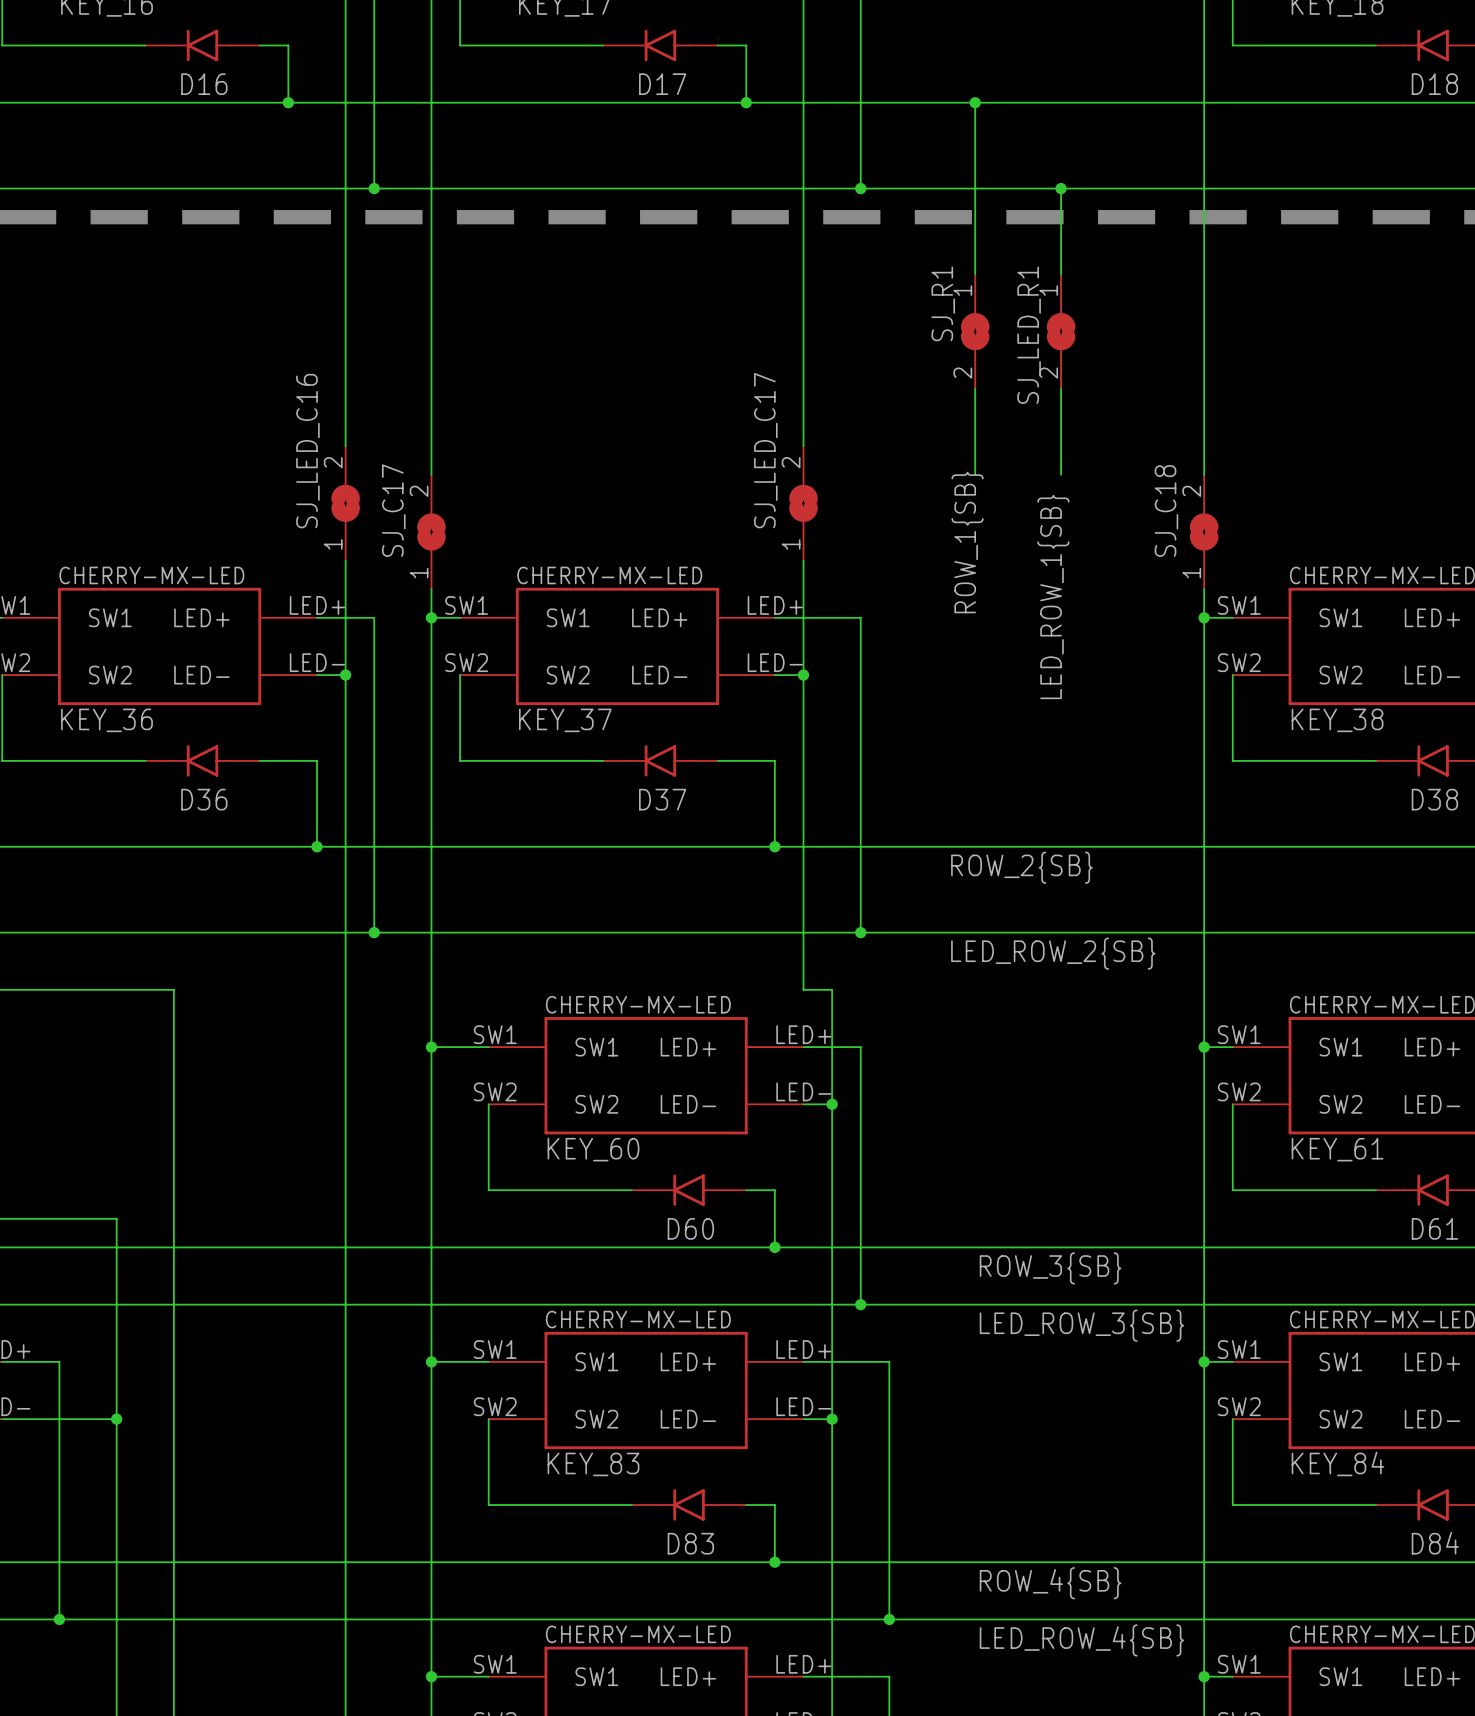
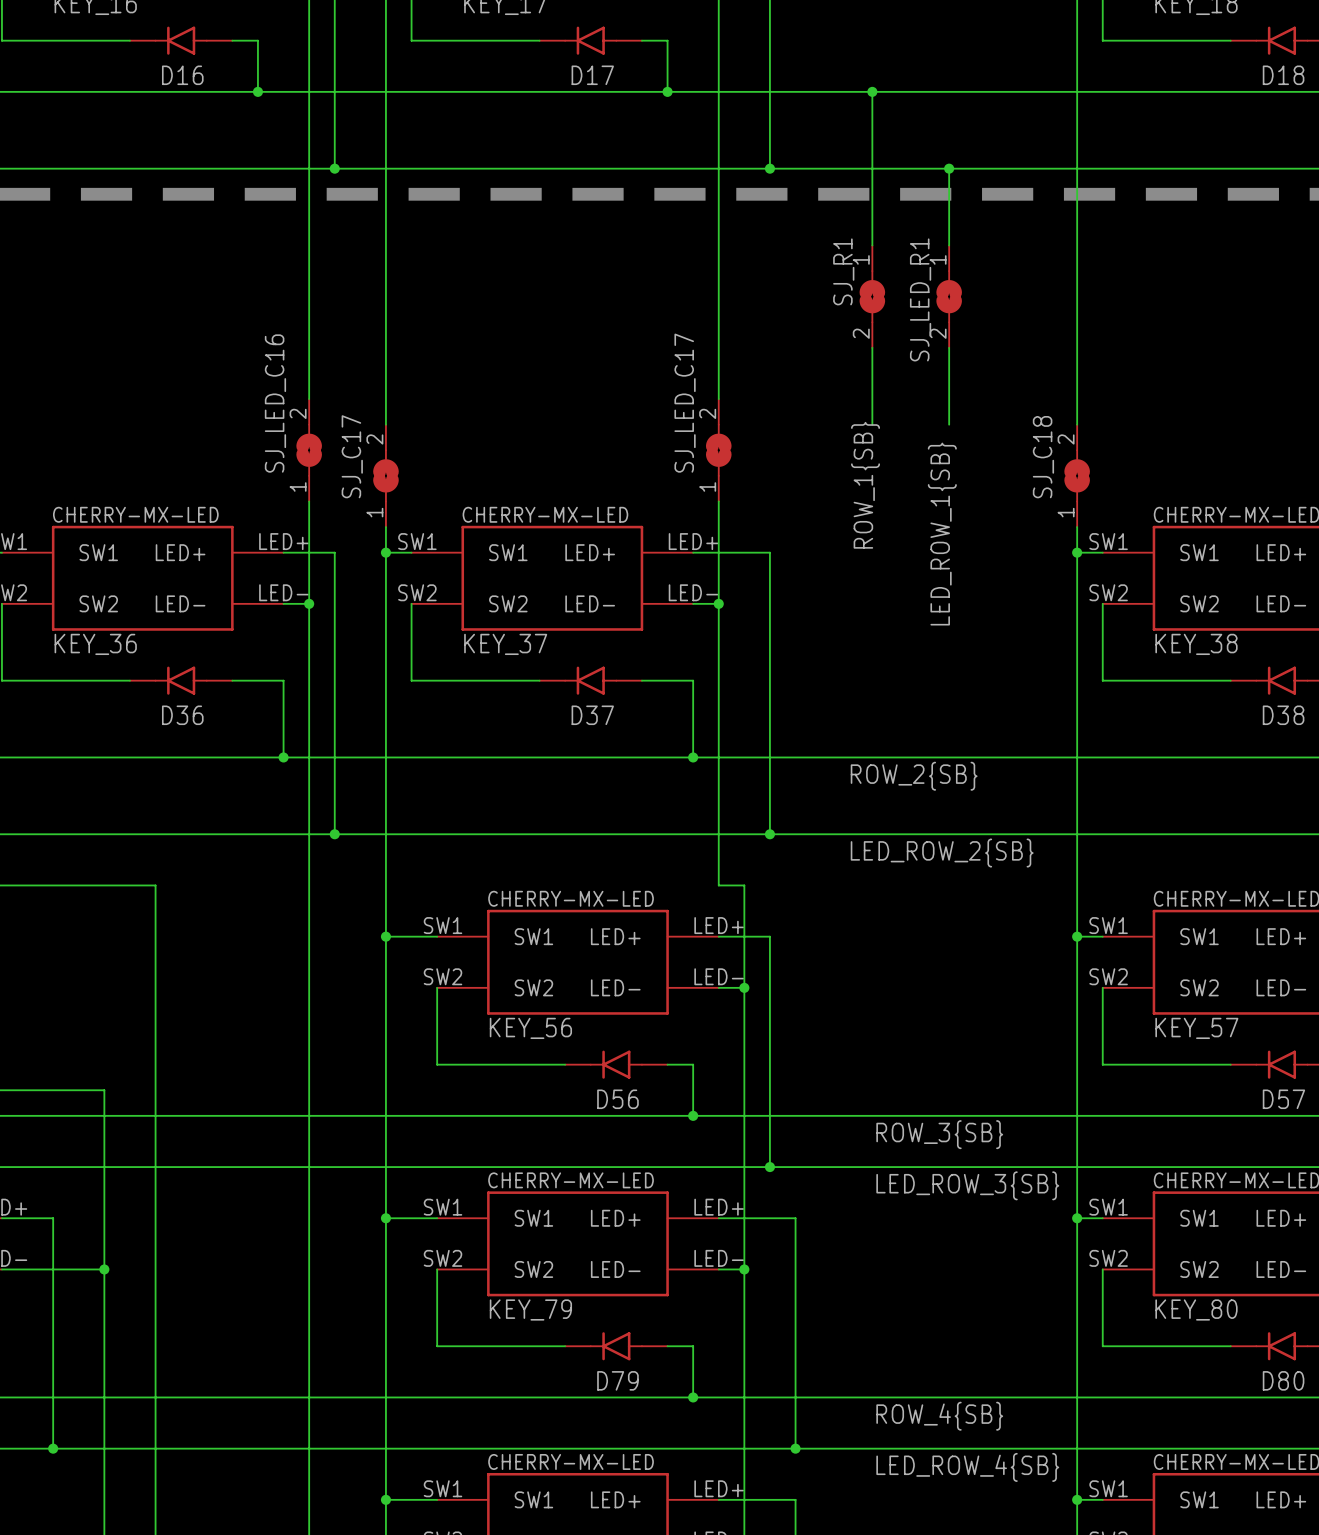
KEY_60 name: KEY_60 (593, 1149) -> KEY_56 (530, 1028)
KEY_61 name: KEY_61 (1337, 1149) -> KEY_57 (1196, 1028)
D60 name: D60 (690, 1228) -> D56 (617, 1099)
D61 name: D61 (1434, 1228) -> D57 (1283, 1099)
KEY_84 name: KEY_84 (1337, 1463) -> KEY_80 (1196, 1309)
KEY_83 name: KEY_83 (593, 1464) -> KEY_79 (530, 1309)
D83 name: D83 (690, 1543) -> D79 (617, 1380)
D84 name: D84 (1435, 1543) -> D80 (1283, 1380)

